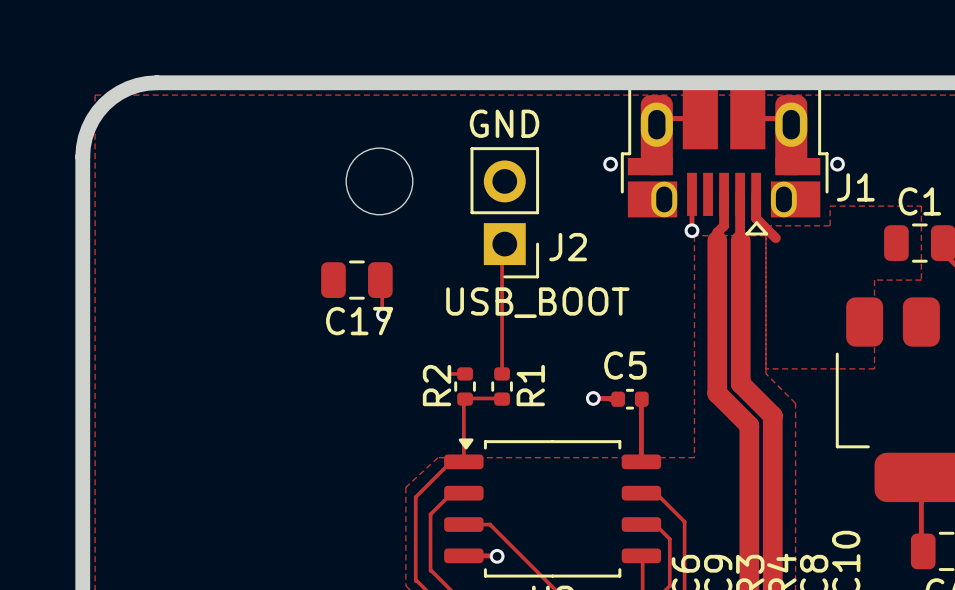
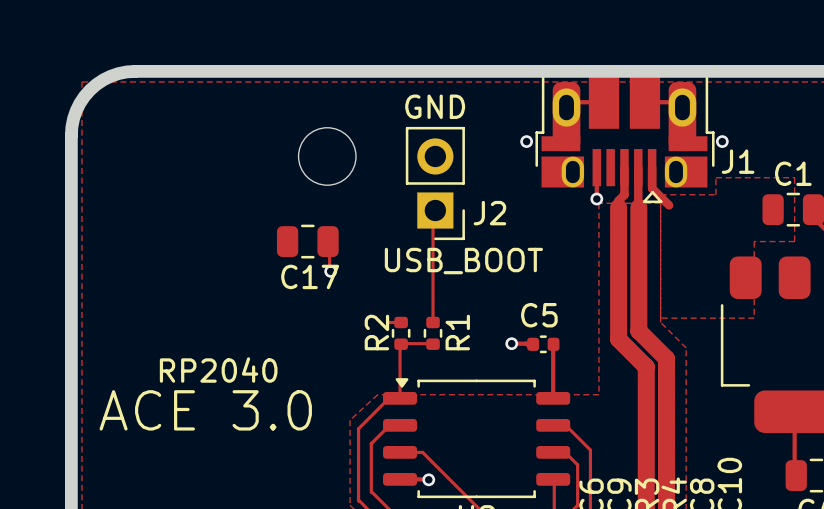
text: none -> RP2040 (218, 370)
text: none -> ACE 3.0 (205, 410)

